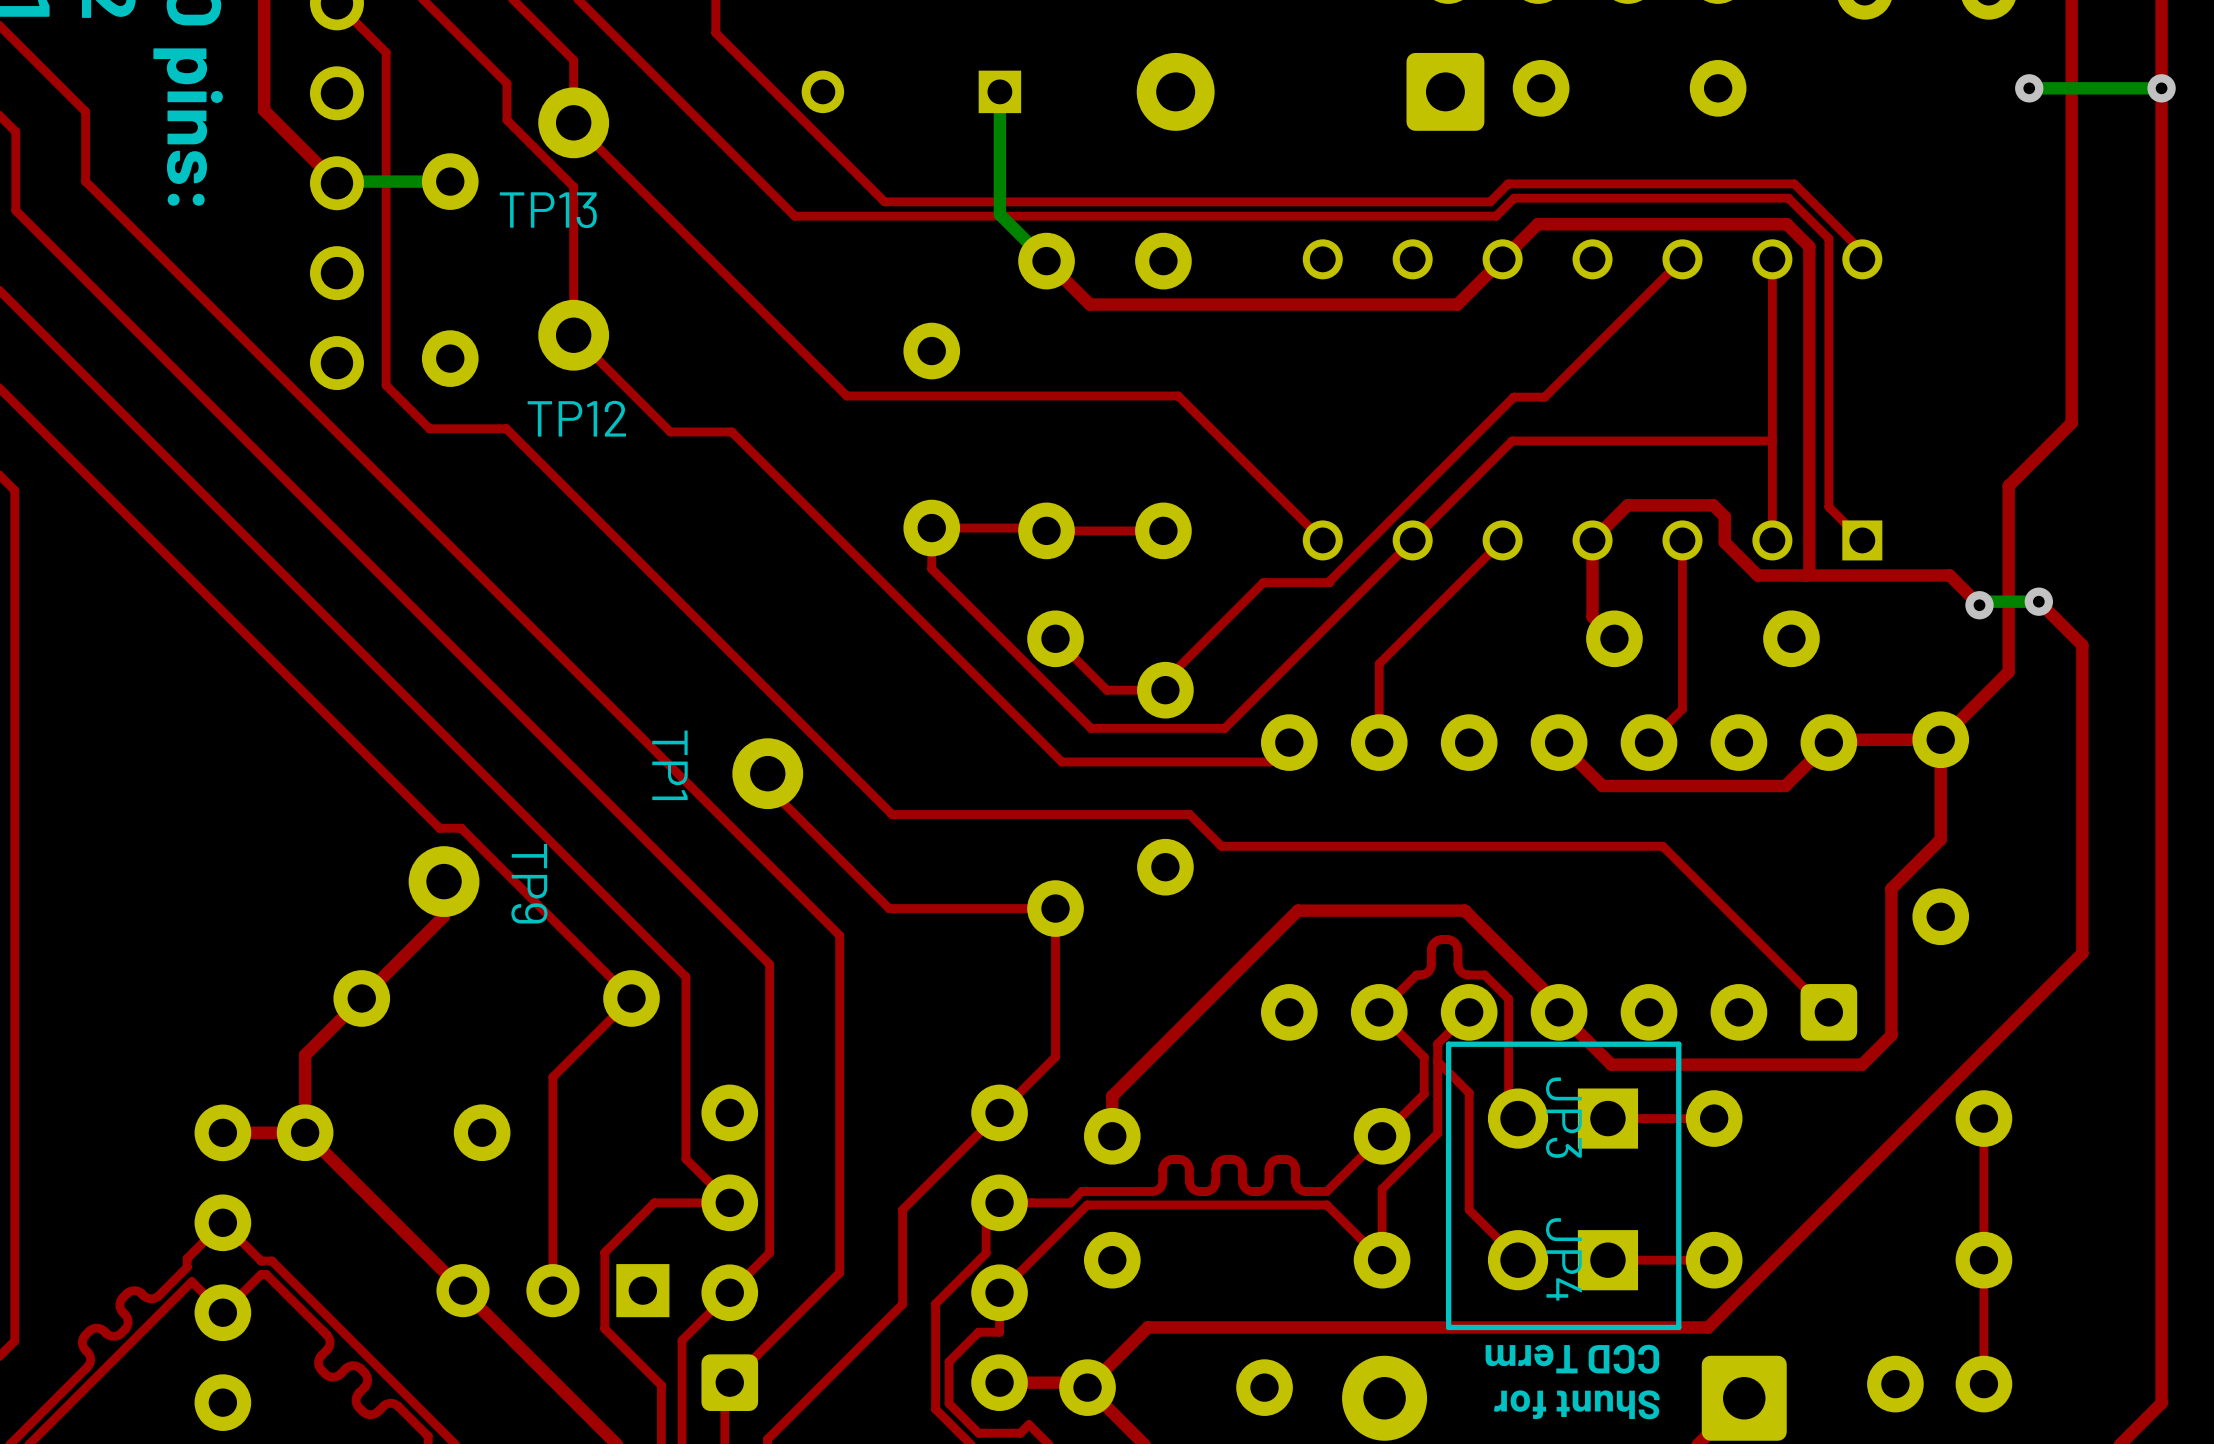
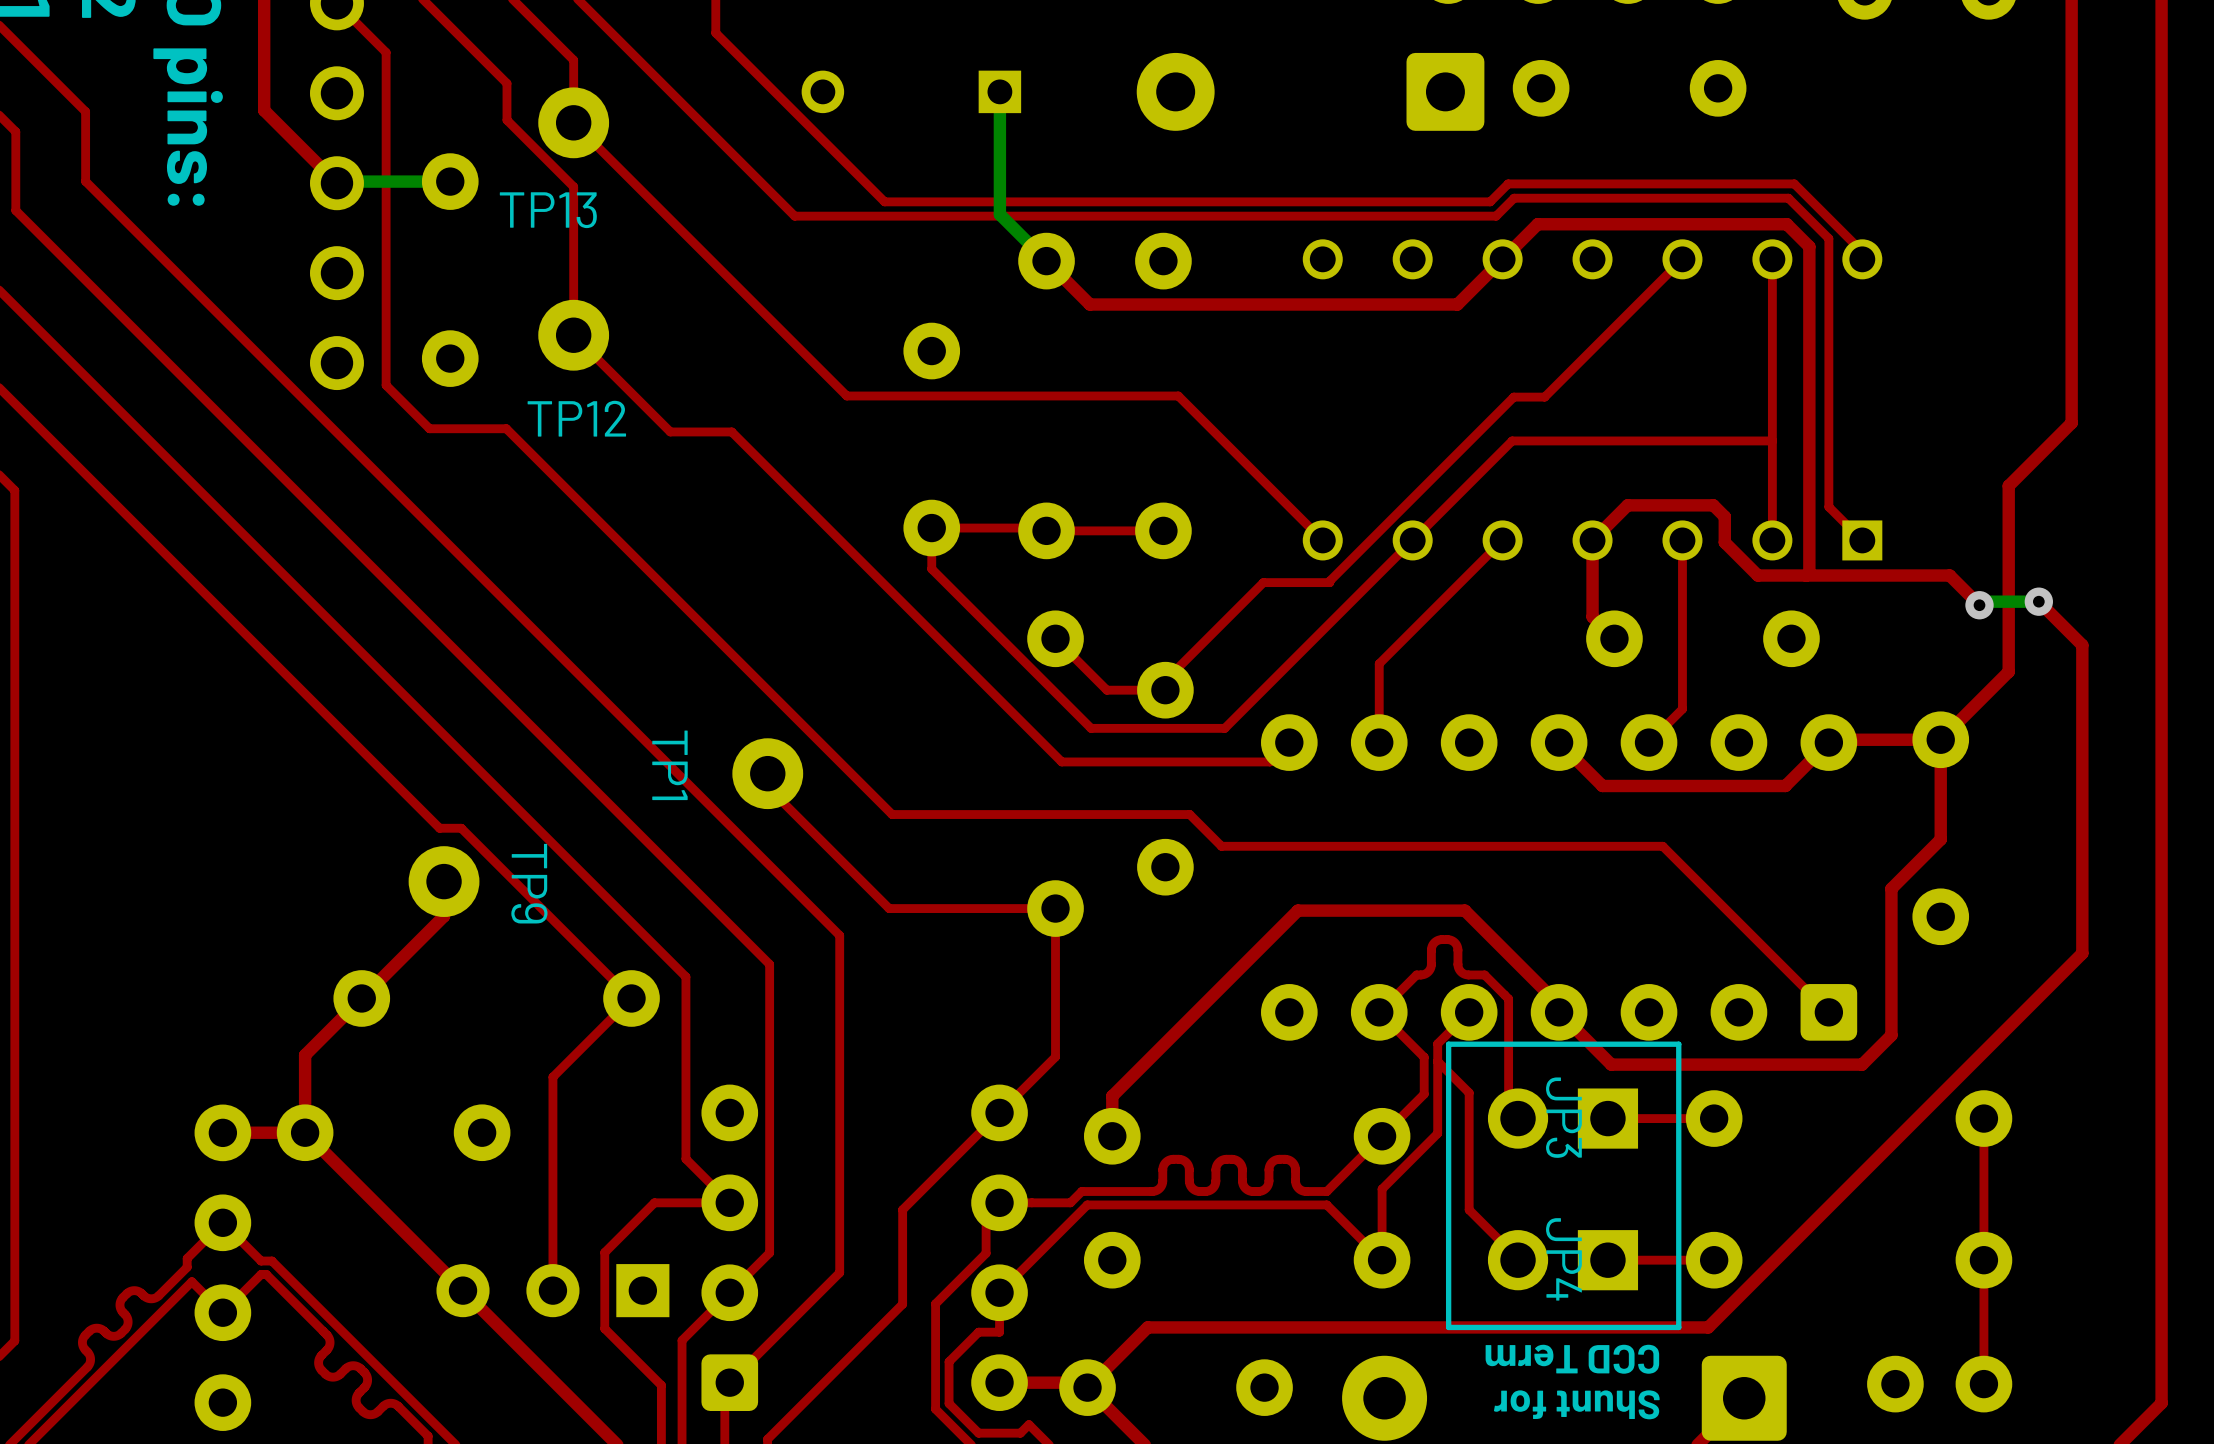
via: (2029, 88) -> none
bottom track: (2161, 88) (2029, 88) -> none
via: (2161, 88) -> none

